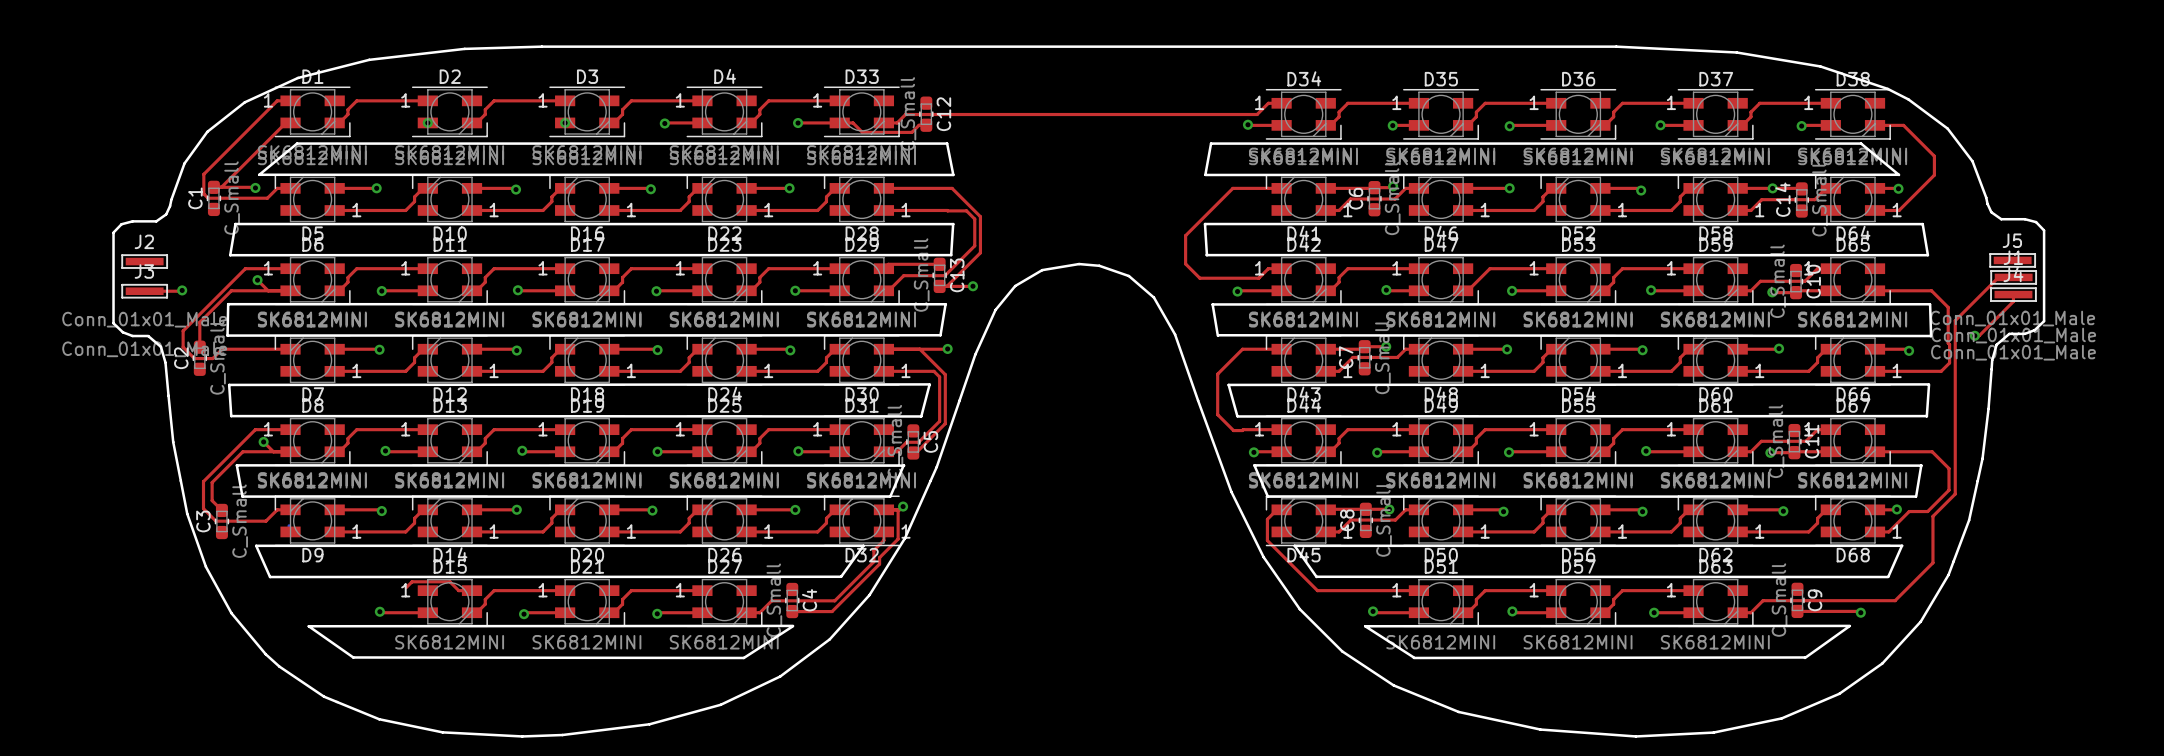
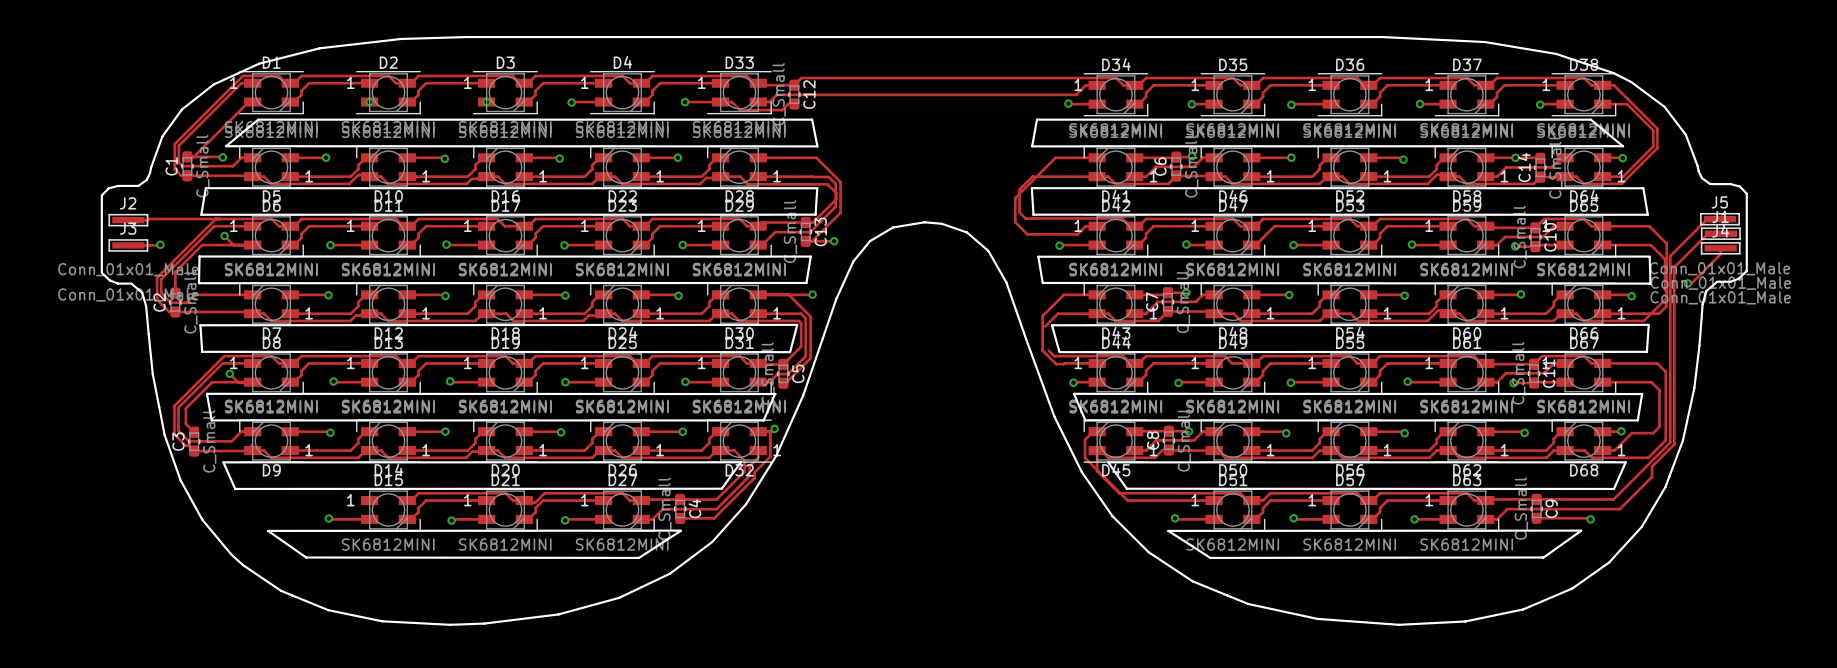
top track: none -> (1720, 219) (1707, 219) (1670, 256) (1670, 442) (1613, 499) (1474, 500) (1467, 493) (1380, 493) (1372, 500) (1364, 500) (1357, 493) (1270, 493) (1263, 500) (1247, 500) (1240, 493) (1119, 493) (1097, 471) (1097, 450) (1101, 450) (1108, 457) (1154, 457) (1162, 450) (1168, 450) (1218, 450) (1225, 457) (1312, 457) (1319, 450) (1335, 450) (1342, 457) (1429, 457) (1436, 450) (1452, 450) (1459, 457) (1546, 457) (1553, 450) (1584, 450) (1591, 457) (1648, 457) (1665, 440) (1665, 414)
top track: none -> (128, 220) (271, 218) (279, 226) (294, 226) (301, 218) (396, 218) (403, 226) (411, 226) (418, 218) (497, 218) (504, 226) (528, 226) (535, 218) (622, 218) (629, 226) (645, 226) (652, 218) (739, 218) (746, 226) (758, 226)
top track: none -> (805, 222) (813, 222) (836, 199) (836, 193) (827, 184) (747, 184) (740, 176) (706, 177) (700, 183) (622, 183) (614, 176) (599, 176) (592, 183) (505, 183) (497, 176) (479, 176) (477, 178) (471, 178) (466, 183) (388, 183) (380, 176) (367, 174) (358, 174) (349, 183) (271, 183) (263, 176) (181, 175) (174, 169) (174, 144) (242, 75) (279, 75) (286, 83) (294, 83) (301, 75) (388, 75) (396, 83) (411, 83) (418, 75) (513, 75) (520, 83) (528, 83) (535, 75) (622, 75) (629, 83) (645, 83) (652, 75) (746, 75) (754, 83) (760, 85) (794, 85) (801, 78) (1116, 78) (1123, 85) (1138, 85) (1146, 78) (1233, 78) (1240, 85) (1255, 85) (1263, 78) (1357, 78) (1364, 85) (1372, 85) (1380, 78) (1467, 78) (1474, 85) (1489, 85) (1497, 78) (1584, 78) (1591, 85) (1614, 85) (1657, 128) (1657, 148) (1621, 183) (1583, 183) (1576, 176) (1540, 177) (1533, 183) (1466, 183) (1459, 176) (1448, 176) (1446, 174) (1436, 174) (1427, 183) (1349, 183) (1342, 176) (1327, 176) (1319, 183) (1232, 183) (1225, 176) (1213, 176) (1176, 176) (1168, 183) (1115, 183) (1108, 176) (1032, 176) (1019, 189) (1019, 212) (1025, 218) (1122, 218) (1130, 226) (1138, 226) (1146, 218) (1233, 218) (1240, 226) (1255, 226) (1263, 218) (1350, 218) (1357, 226) (1372, 226) (1380, 218) (1467, 218) (1474, 226) (1487, 227) (1535, 227) (1544, 218) (1584, 218) (1591, 226) (1649, 226) (1666, 243) (1666, 298) (1643, 320) (1583, 320) (1576, 313) (1561, 313) (1553, 320) (1466, 320) (1459, 313) (1448, 313) (1445, 310) (1437, 310) (1427, 320) (1358, 320) (1350, 313) (1327, 313) (1319, 320) (1241, 320) (1233, 313) (1167, 311) (1158, 320) (1115, 320) (1108, 313) (1058, 313) (1045, 326)
top track: (1959, 316) (1955, 320) (1955, 494) (1932, 516) (1932, 550) -> (1674, 267) (1674, 444) (1652, 466)
top track: (1941, 461) (1949, 468) -> (1048, 350) (1054, 356) (1123, 356) (1130, 363) (1138, 363) (1146, 356) (1224, 356) (1232, 363) (1255, 363) (1263, 356) (1350, 356) (1357, 363) (1372, 363) (1380, 356) (1474, 356) (1481, 363) (1486, 364) (1534, 364) (1542, 356) (1584, 356) (1591, 363) (1657, 363) (1665, 371) (1665, 396)
top track: (1949, 490) (1927, 511) -> (1659, 390) (1659, 426) (1653, 433) (1647, 433)
top track: (406, 587) (412, 581) (449, 581) (458, 590) (472, 590) -> (215, 218) (157, 277) (157, 299) (169, 311) (250, 311) (263, 313) (271, 320) (350, 320) (355, 315) (362, 313) (380, 313) (388, 320) (475, 320) (482, 313) (506, 313) (513, 320) (583, 320) (588, 315) (601, 315) (603, 313) (614, 313) (622, 320) (709, 320) (716, 313) (731, 313) (739, 320) (798, 320) (801, 323) (801, 346) (783, 364) (746, 363) (739, 356) (652, 356) (645, 363) (637, 363) (629, 356) (535, 356) (528, 363) (513, 363) (505, 356) (418, 356) (411, 363) (403, 363) (396, 356) (301, 356) (294, 363) (279, 363) (271, 356) (224, 356) (174, 405) (174, 434) (194, 451) (263, 450) (271, 457) (358, 457) (365, 450) (380, 450) (388, 457) (466, 457) (472, 451) (497, 450) (505, 457) (592, 457) (599, 450) (614, 450) (622, 457) (709, 457) (716, 450) (734, 450) (744, 460) (744, 471) (716, 499) (629, 500) (622, 493) (544, 493) (535, 502) (526, 502) (524, 500) (513, 500) (505, 493) (418, 493) (411, 500) (407, 500)

